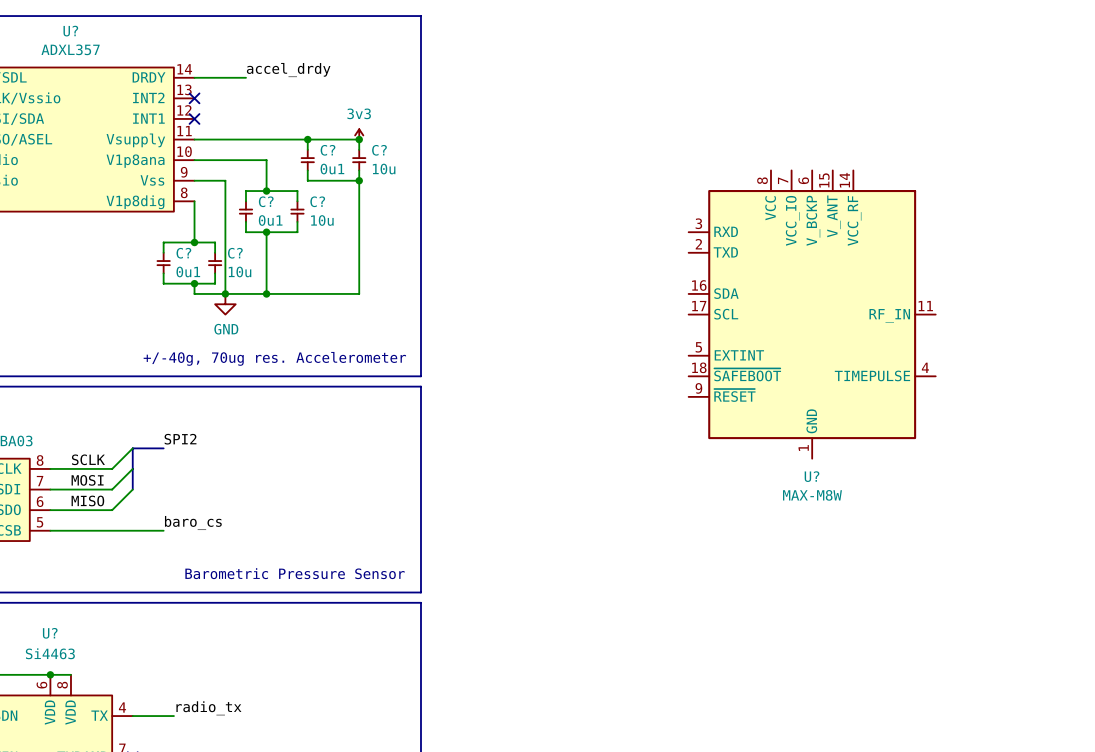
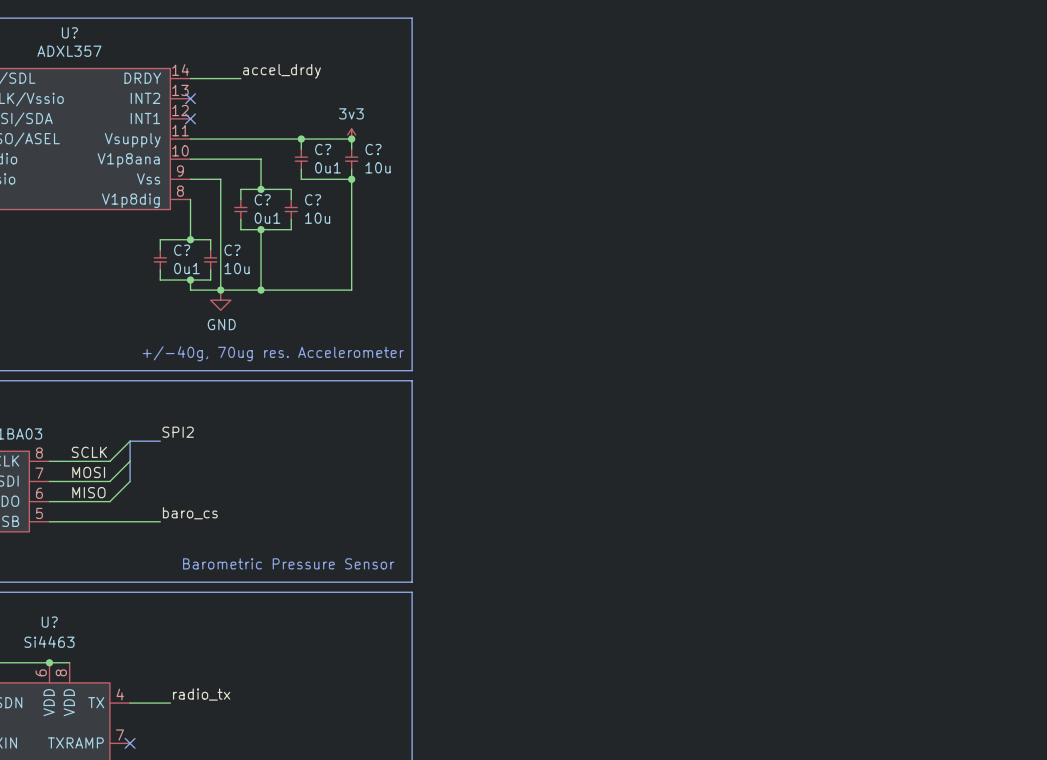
U?: MAX-M8W (812, 314) -> none

